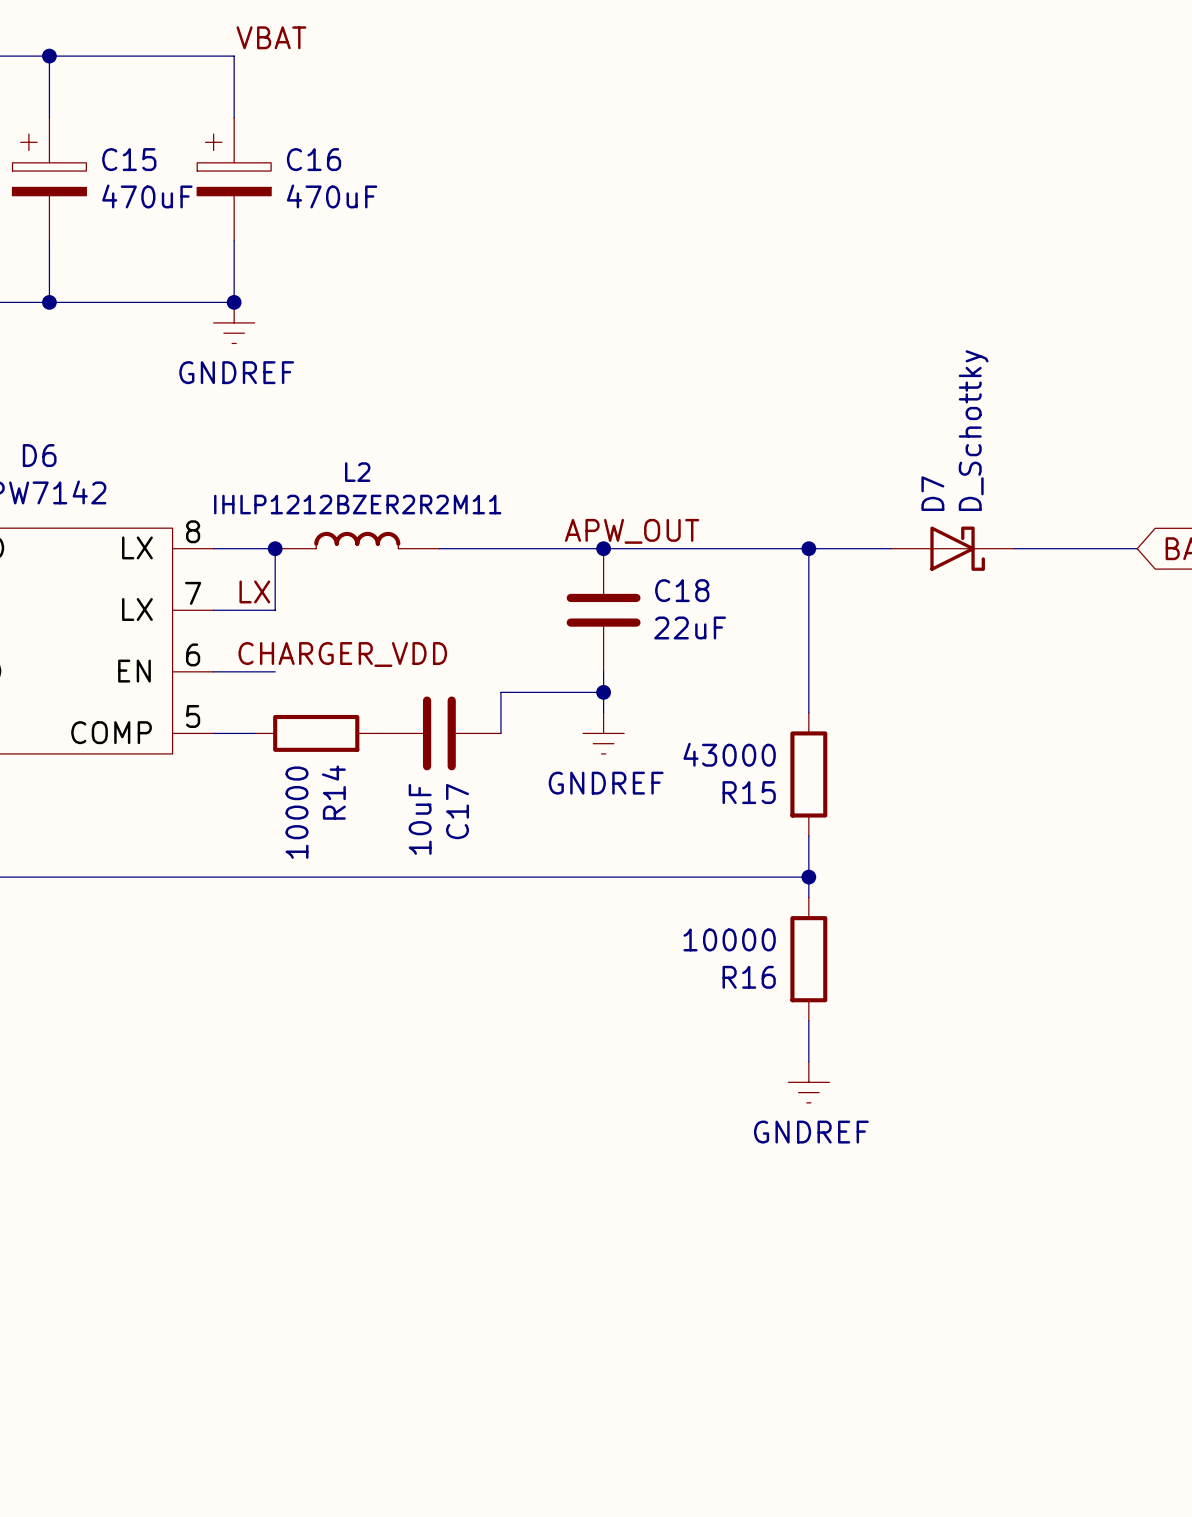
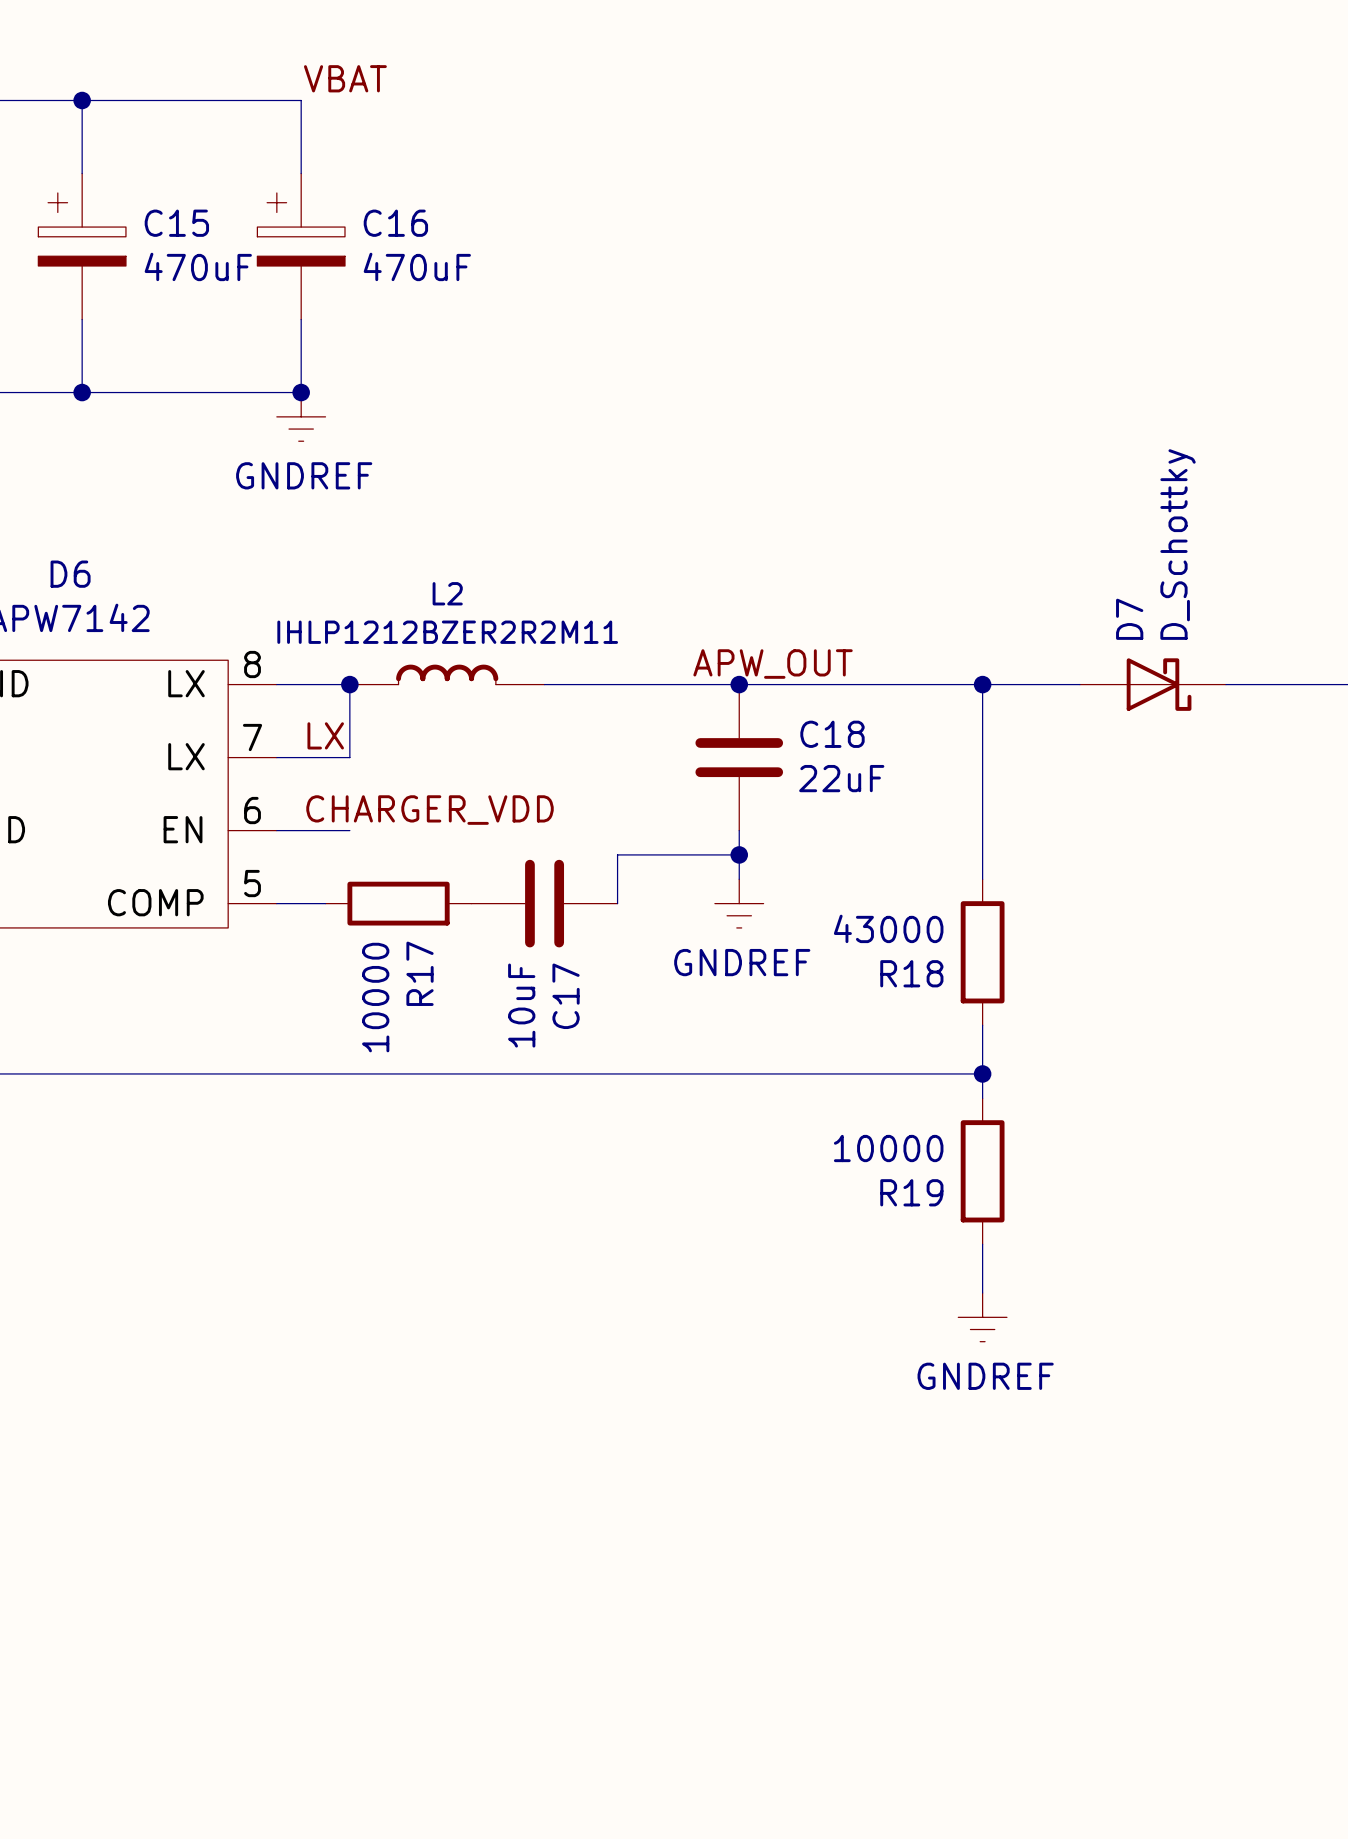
R14 name: R14 (333, 792) -> R17 (420, 973)
R15 name: R15 (749, 792) -> R18 (911, 973)
R16 name: R16 (749, 977) -> R19 (911, 1192)

